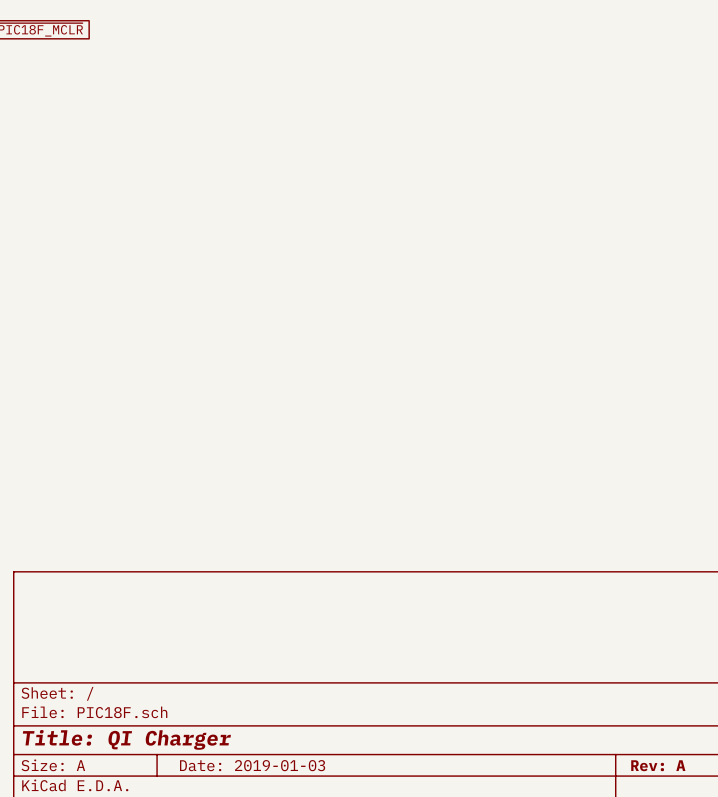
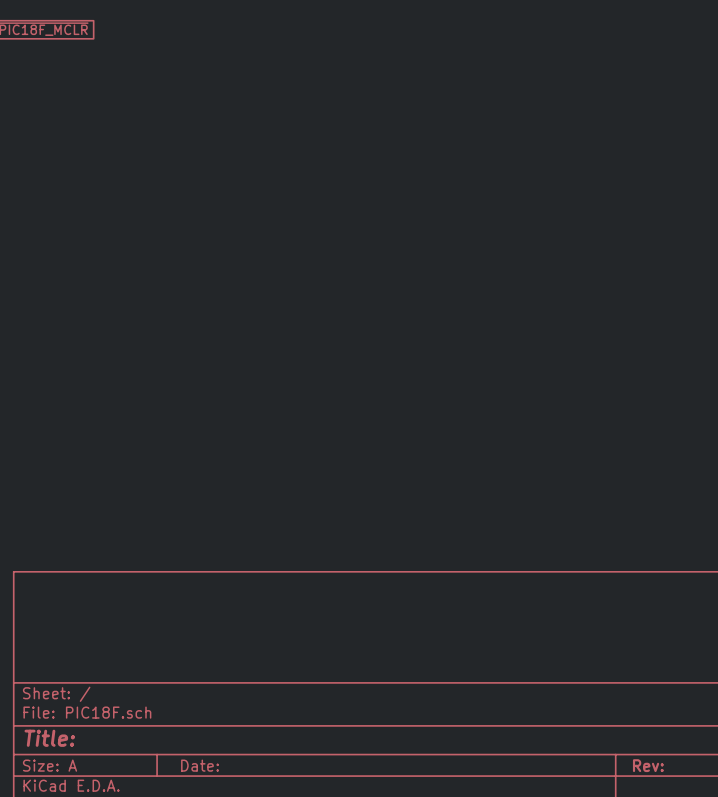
title block: Title: QI Charger (126, 739) -> Title: (49, 738)
title block: Date: 2019-01-03 (252, 765) -> Date: (200, 765)
title block: Rev: A (658, 765) -> Rev: (648, 765)

